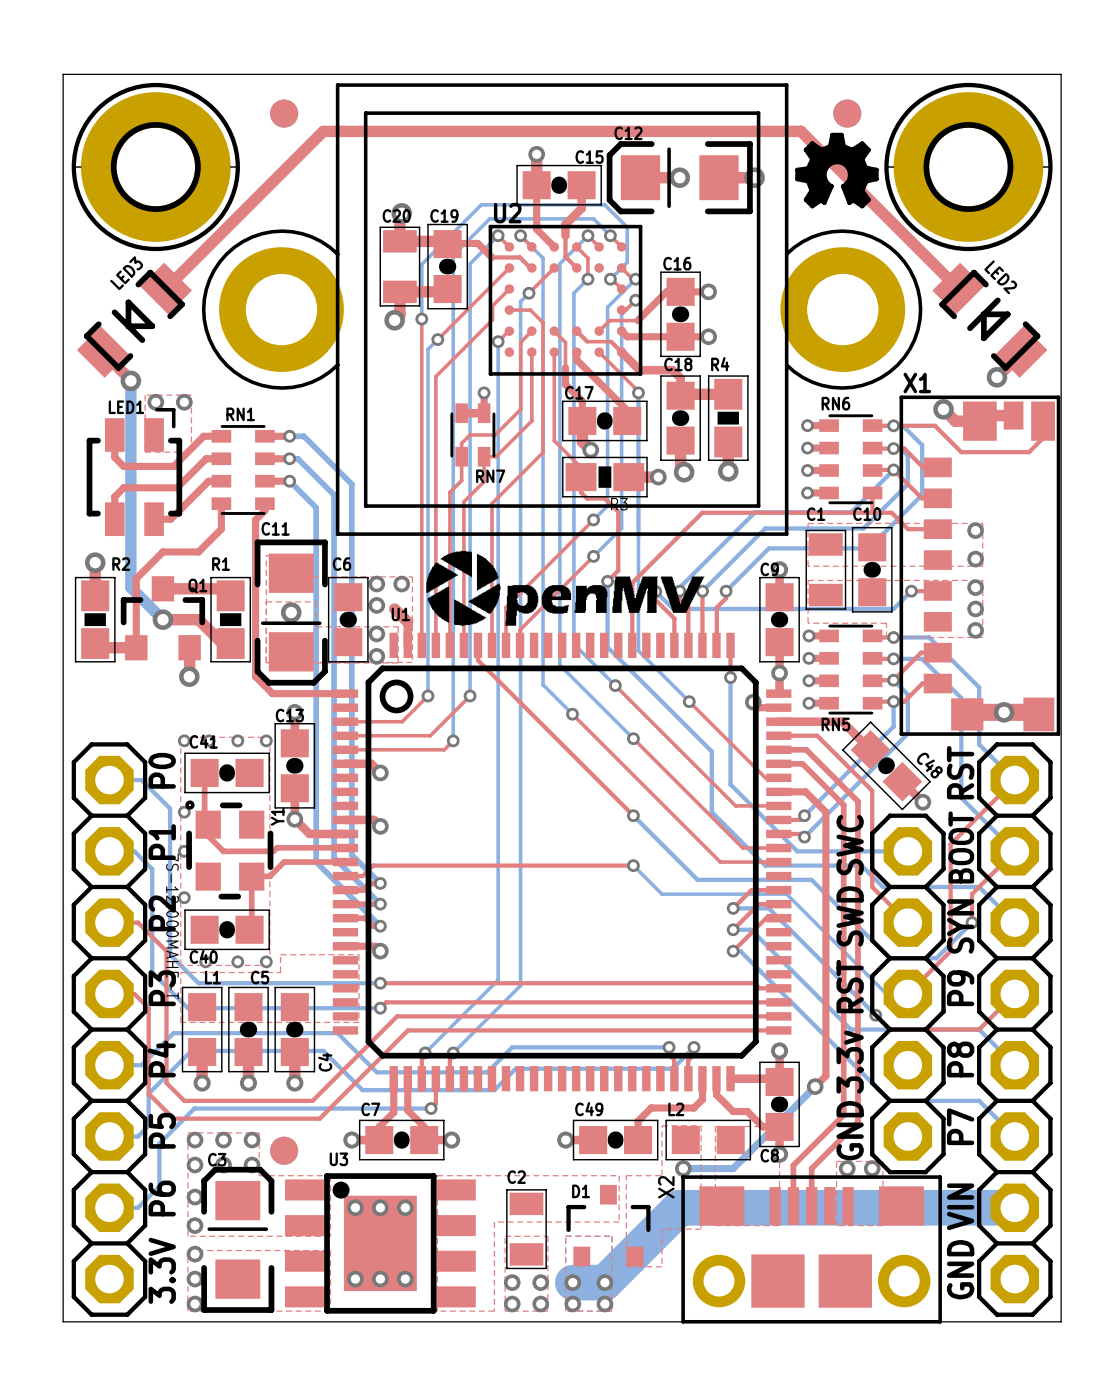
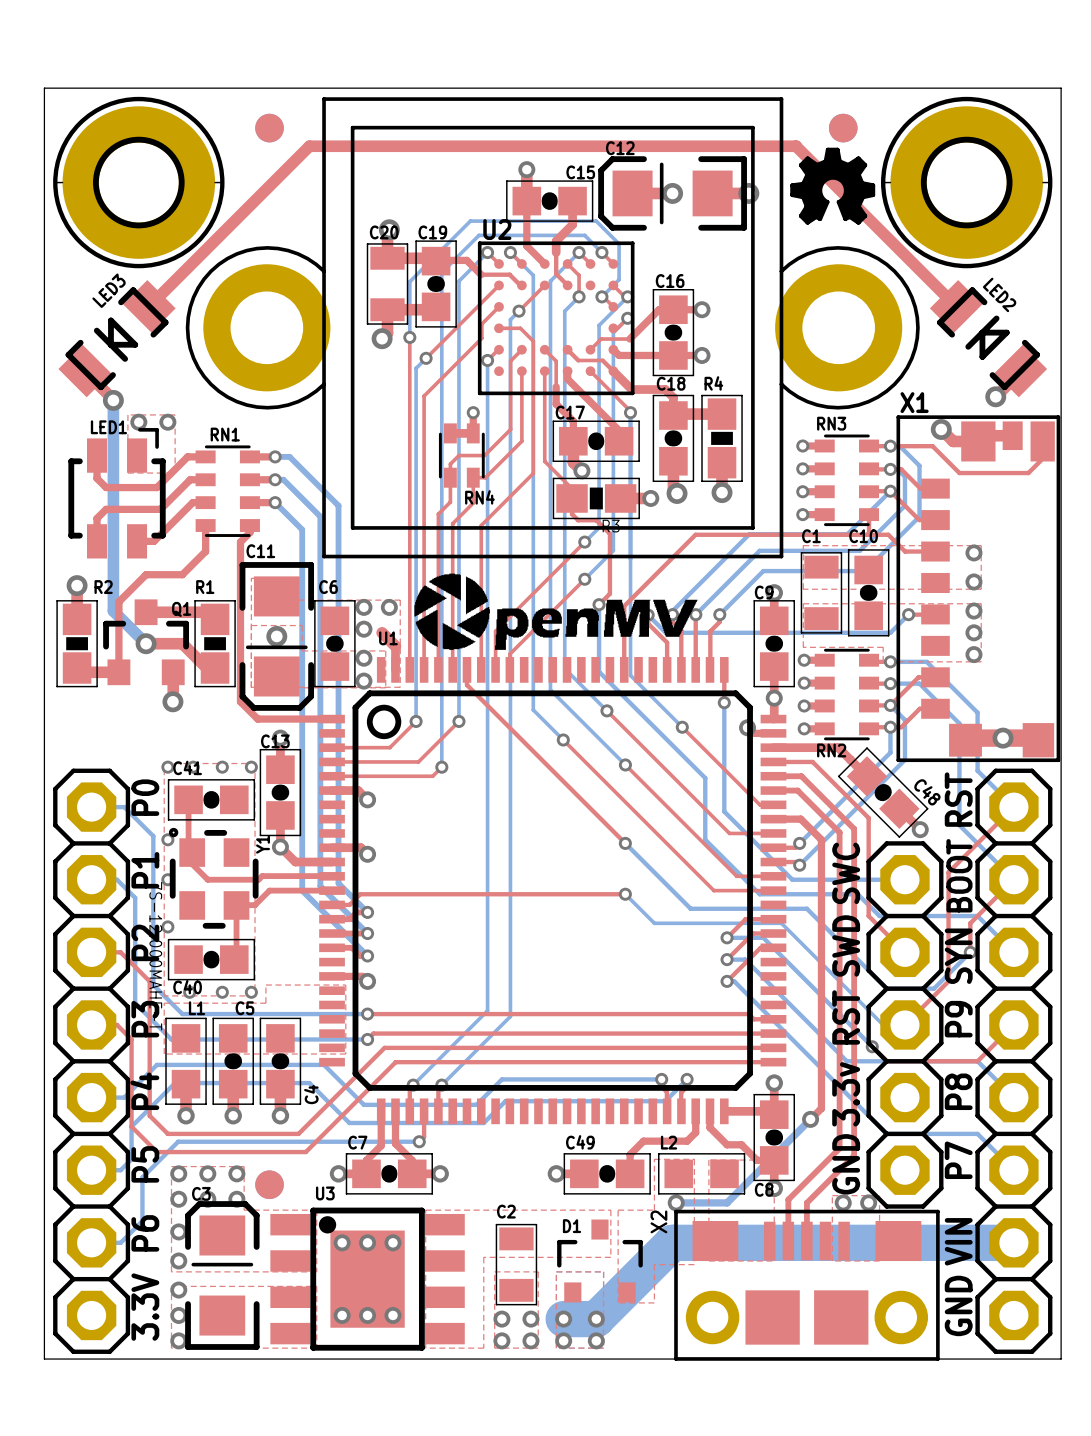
RN6 name: RN6 (835, 403) -> RN3 (831, 423)
RN7 name: RN7 (490, 476) -> RN4 (479, 497)
RN5 name: RN5 (835, 724) -> RN2 (831, 750)

